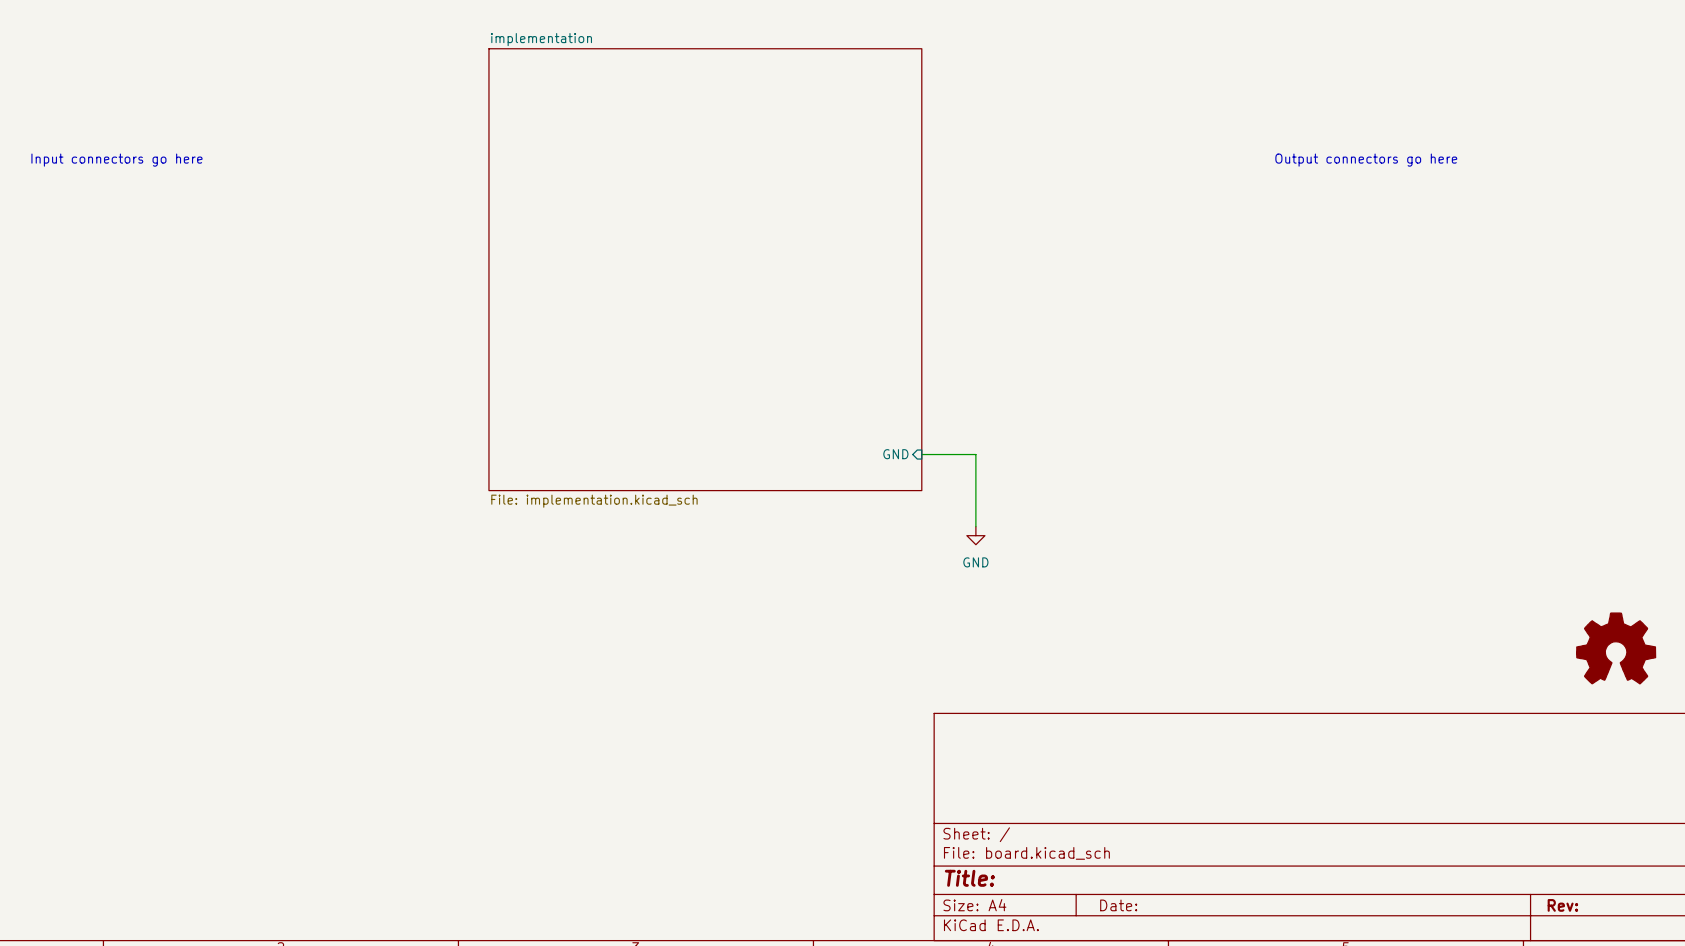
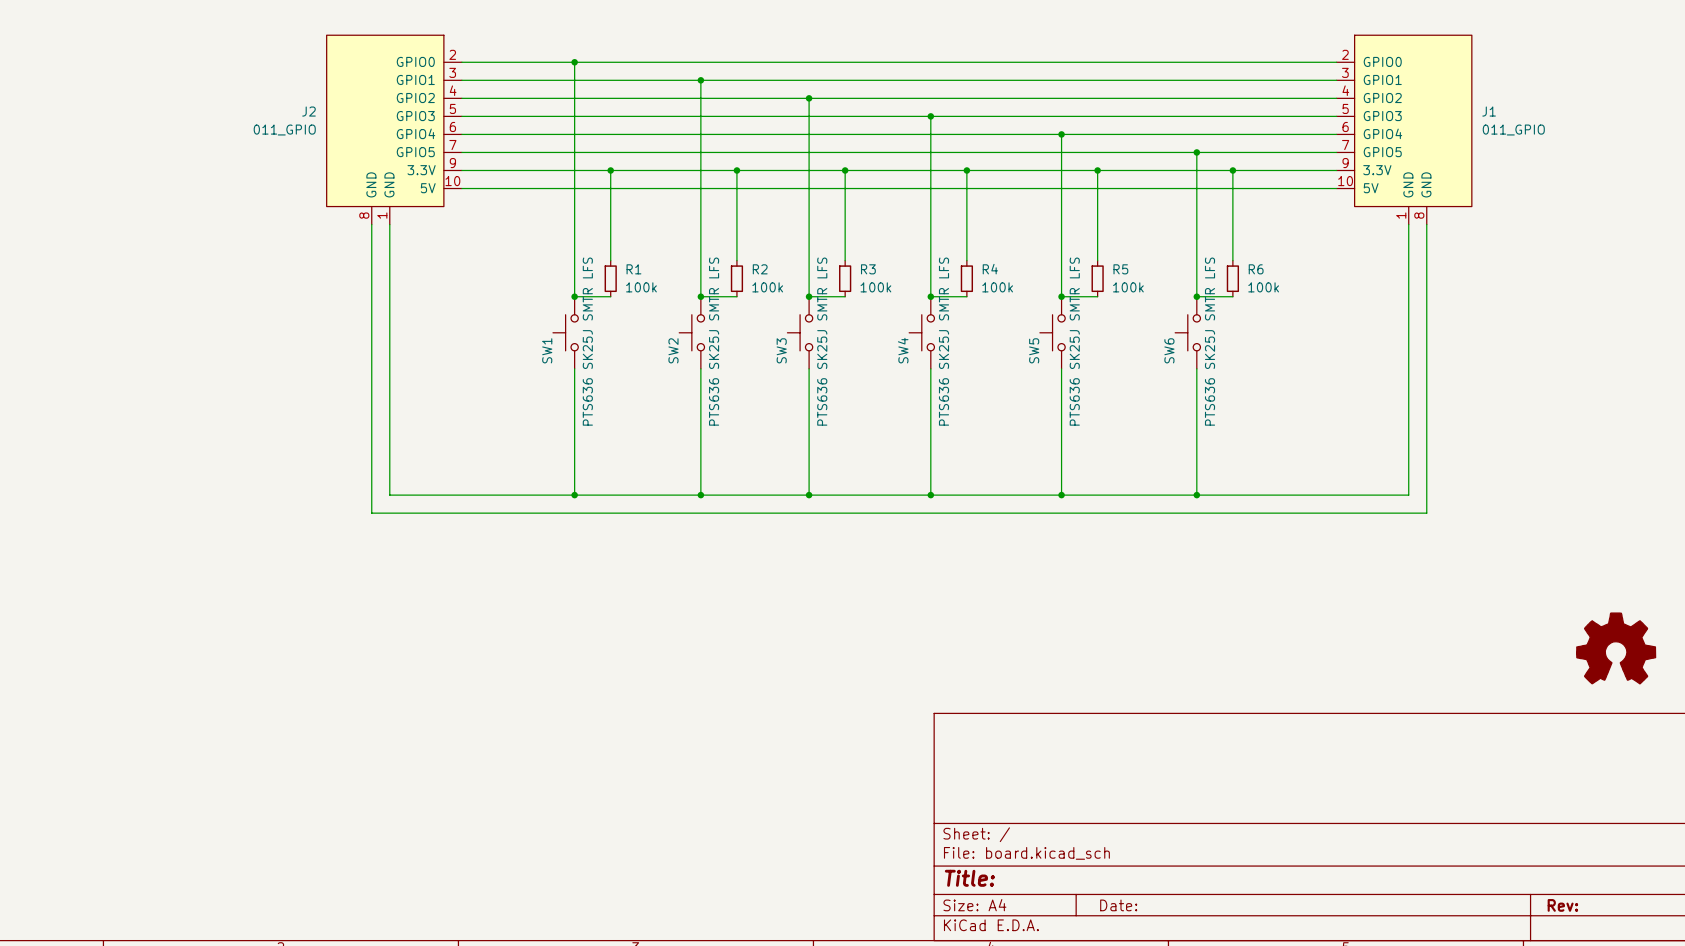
wire: none -> (461, 62) (1336, 62)
wire: none -> (574, 62) (574, 296) (610, 296)
junction: none -> (574, 62)
wire: none -> (461, 80) (1336, 80)
wire: none -> (700, 80) (700, 296) (736, 296)
junction: none -> (700, 80)
wire: none -> (461, 98) (1336, 98)
wire: none -> (809, 98) (809, 296) (845, 296)
junction: none -> (809, 98)
wire: none -> (461, 116) (1336, 116)
wire: none -> (930, 116) (930, 296) (966, 296)
junction: none -> (930, 116)
J2: none -> 011_GPIO (394, 129)
J1: none -> 011_GPIO (1404, 129)
wire: none -> (461, 134) (1336, 134)
wire: none -> (1061, 134) (1061, 296) (1097, 296)
junction: none -> (1061, 134)
wire: none -> (461, 152) (1336, 152)
wire: none -> (1196, 152) (1196, 296) (1232, 296)
junction: none -> (1196, 152)
text: Input connectors go here (116, 160) -> none
text: Output connectors go here (1366, 160) -> none
wire: none -> (461, 170) (1336, 170)
wire: none -> (610, 170) (610, 260)
junction: none -> (610, 170)
wire: none -> (736, 170) (736, 260)
junction: none -> (736, 170)
wire: none -> (845, 170) (845, 260)
junction: none -> (845, 170)
wire: none -> (966, 170) (966, 260)
junction: none -> (966, 170)
wire: none -> (1097, 170) (1097, 260)
junction: none -> (1097, 170)
wire: none -> (1232, 170) (1232, 260)
junction: none -> (1232, 170)
wire: none -> (461, 188) (1336, 188)
wire: none -> (371, 224) (371, 513) (1426, 513) (1426, 224)
wire: none -> (389, 224) (389, 495) (1408, 495) (1408, 224)
sheet implementation: File: implementation.kicad_sch (705, 269) -> none
R1: none -> 100k (610, 278)
R2: none -> 100k (736, 278)
R3: none -> 100k (845, 278)
R4: none -> 100k (966, 278)
R5: none -> 100k (1097, 278)
R6: none -> 100k (1232, 278)
junction: none -> (574, 296)
junction: none -> (700, 296)
junction: none -> (809, 296)
junction: none -> (930, 296)
junction: none -> (1061, 296)
junction: none -> (1196, 296)
SW1: none -> PTS636 SK25J SMTR LFS (565, 332)
SW2: none -> PTS636 SK25J SMTR LFS (691, 332)
SW3: none -> PTS636 SK25J SMTR LFS (800, 332)
SW4: none -> PTS636 SK25J SMTR LFS (921, 332)
SW5: none -> PTS636 SK25J SMTR LFS (1052, 332)
SW6: none -> PTS636 SK25J SMTR LFS (1187, 332)
wire: none -> (574, 368) (574, 495)
wire: none -> (700, 368) (700, 495)
wire: none -> (809, 368) (809, 495)
wire: none -> (930, 368) (930, 495)
wire: none -> (1061, 368) (1061, 495)
wire: none -> (1196, 368) (1196, 495)
sheet pin: GND (895, 454) -> none
wire: (921, 454) (975, 454) (975, 526) -> none
junction: none -> (574, 495)
junction: none -> (700, 495)
junction: none -> (809, 495)
junction: none -> (930, 495)
junction: none -> (1061, 495)
junction: none -> (1196, 495)
power symbol: GND (975, 535) -> none

